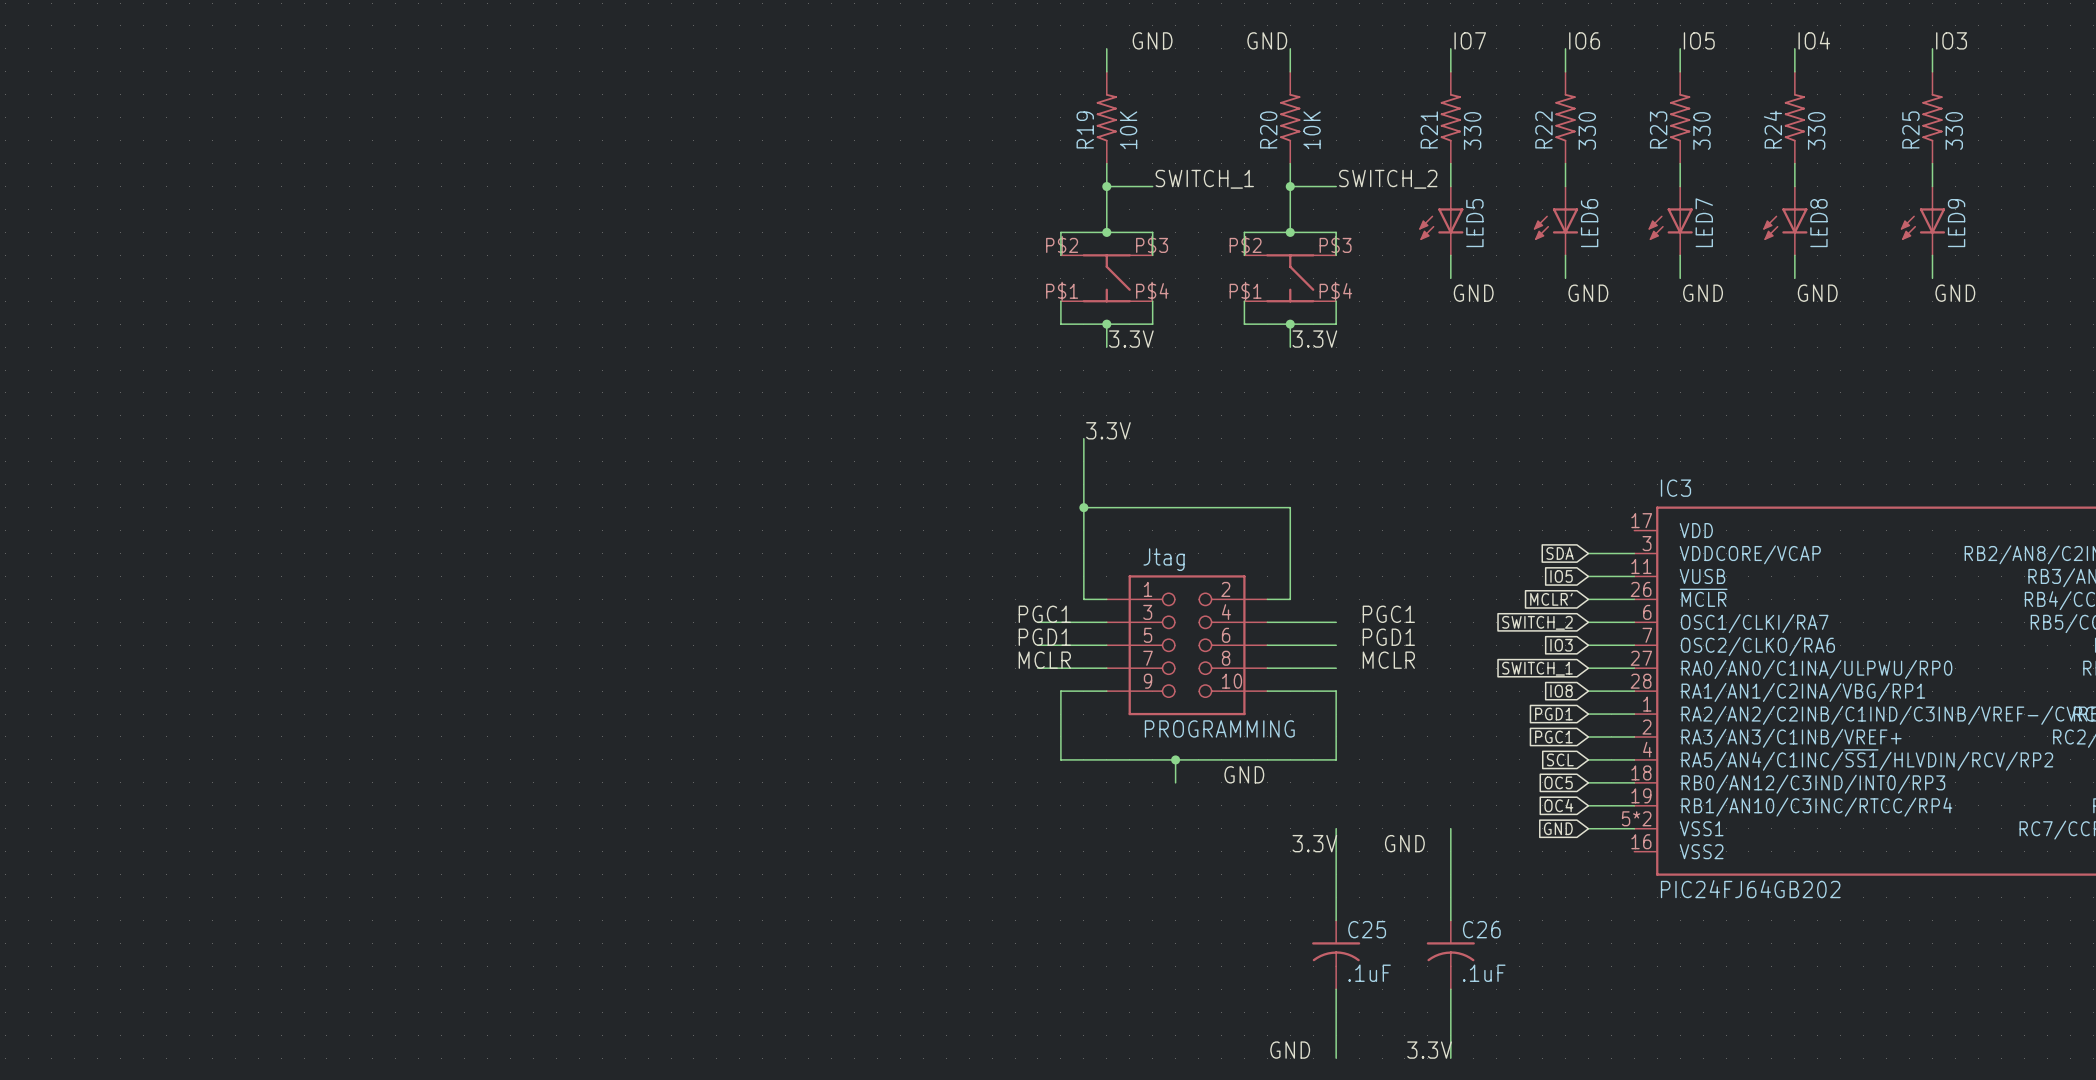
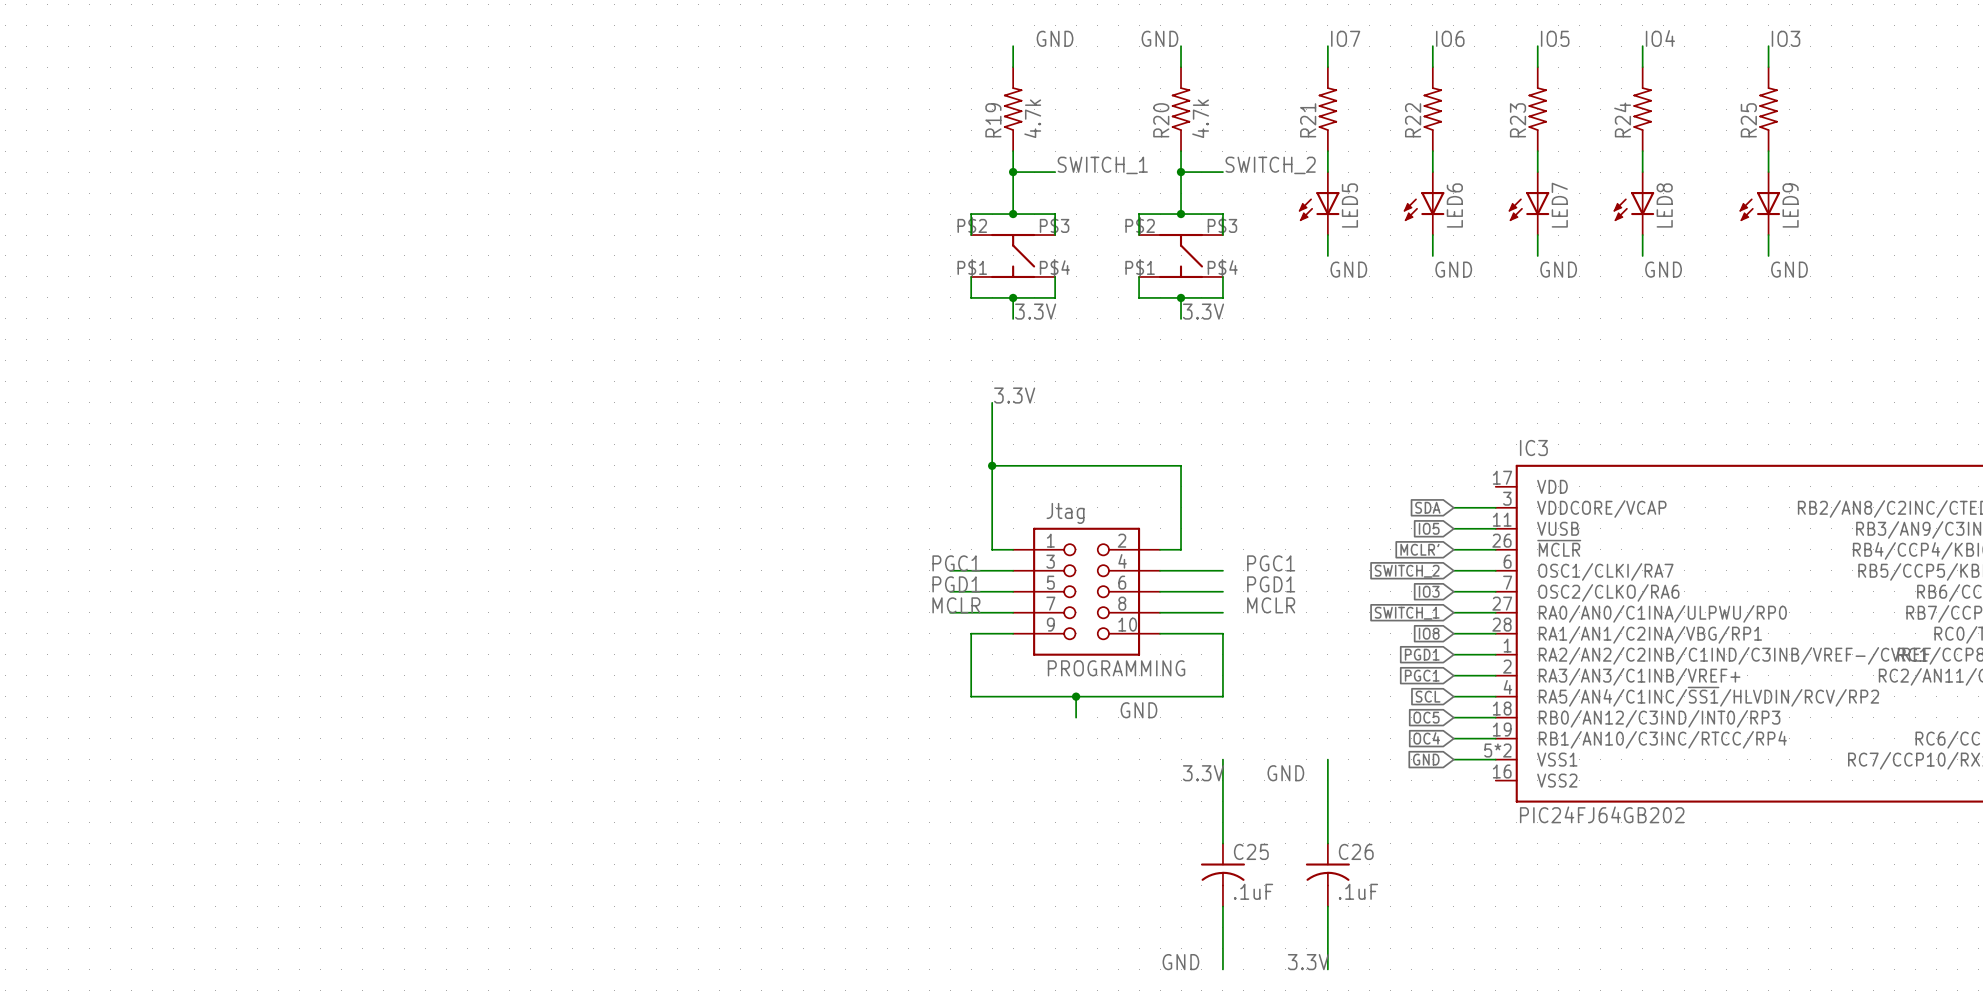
R19 value: 10K (1128, 130) -> 4.7k (1032, 118)
R20 value: 10K (1312, 130) -> 4.7k (1200, 118)
R21 value: 330 (1472, 130) -> none
R22 value: 330 (1587, 130) -> none
R23 value: 330 (1701, 130) -> none
R24 value: 330 (1816, 130) -> none
R25 value: 330 (1954, 130) -> none

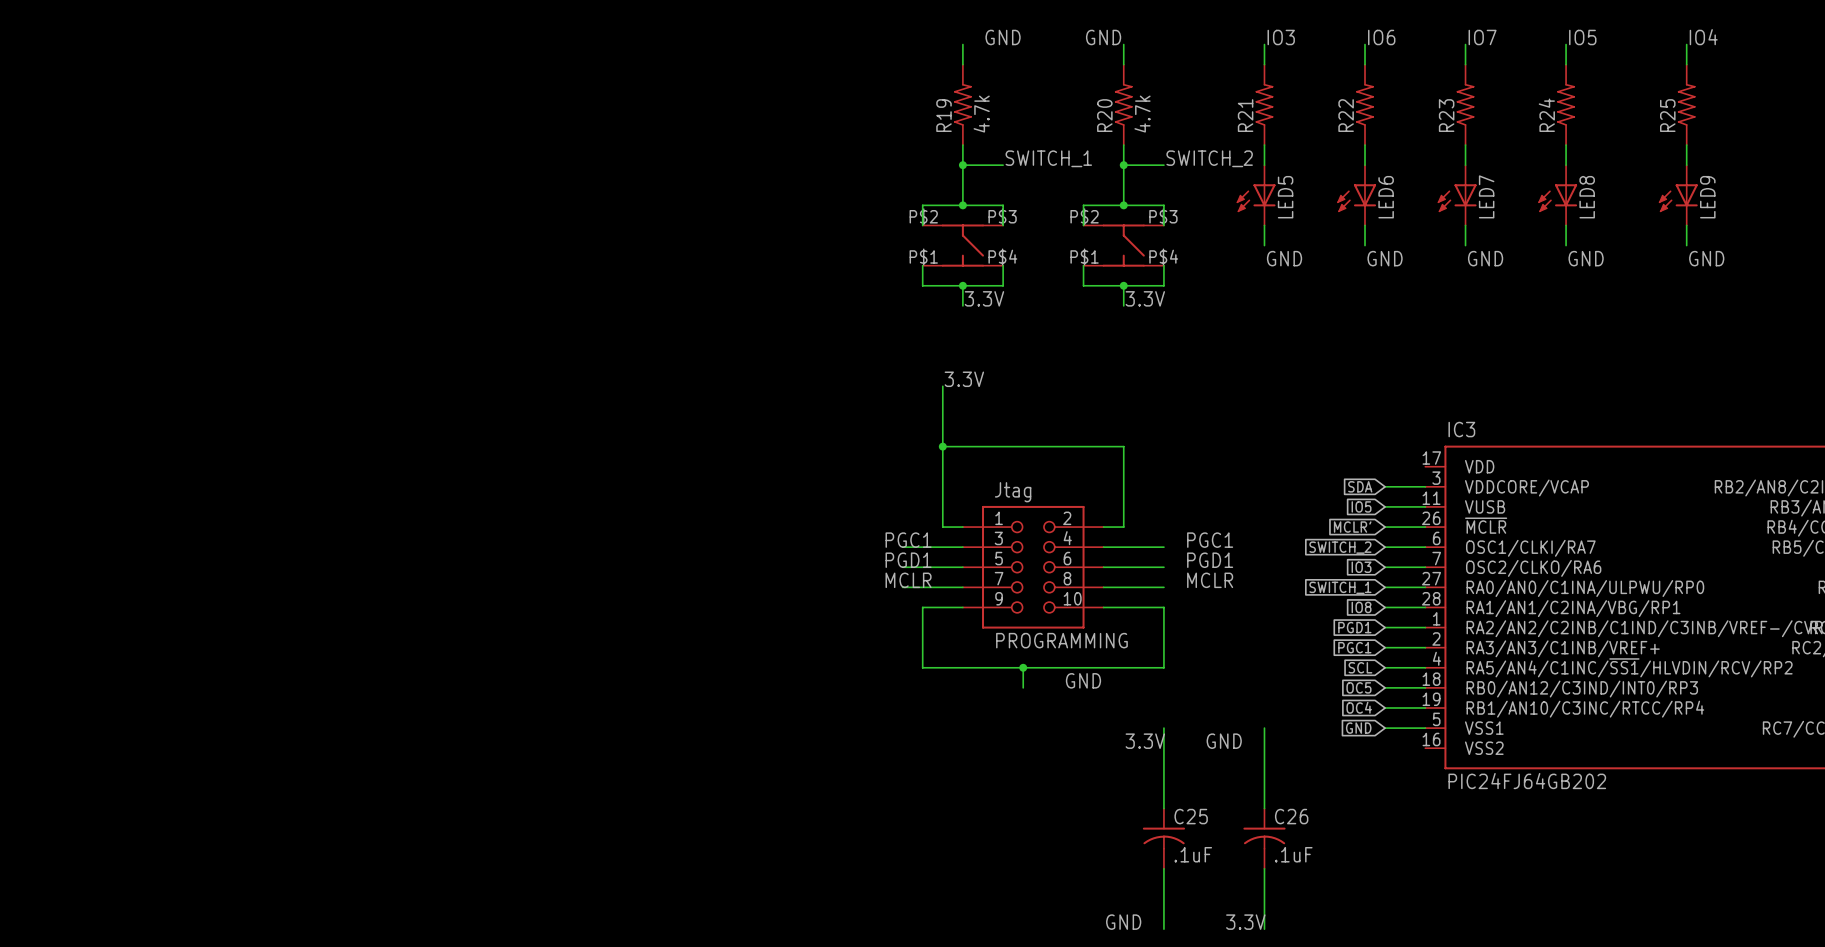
label: IO7 (1345, 38) -> IO3 (1281, 37)
label: IO5 (1555, 38) -> IO7 (1482, 37)
label: IO4 (1660, 38) -> IO5 (1582, 37)
label: IO3 (1786, 38) -> IO4 (1703, 37)
IC3 pin number: 5*2 (1497, 750) -> 5 (1436, 719)

